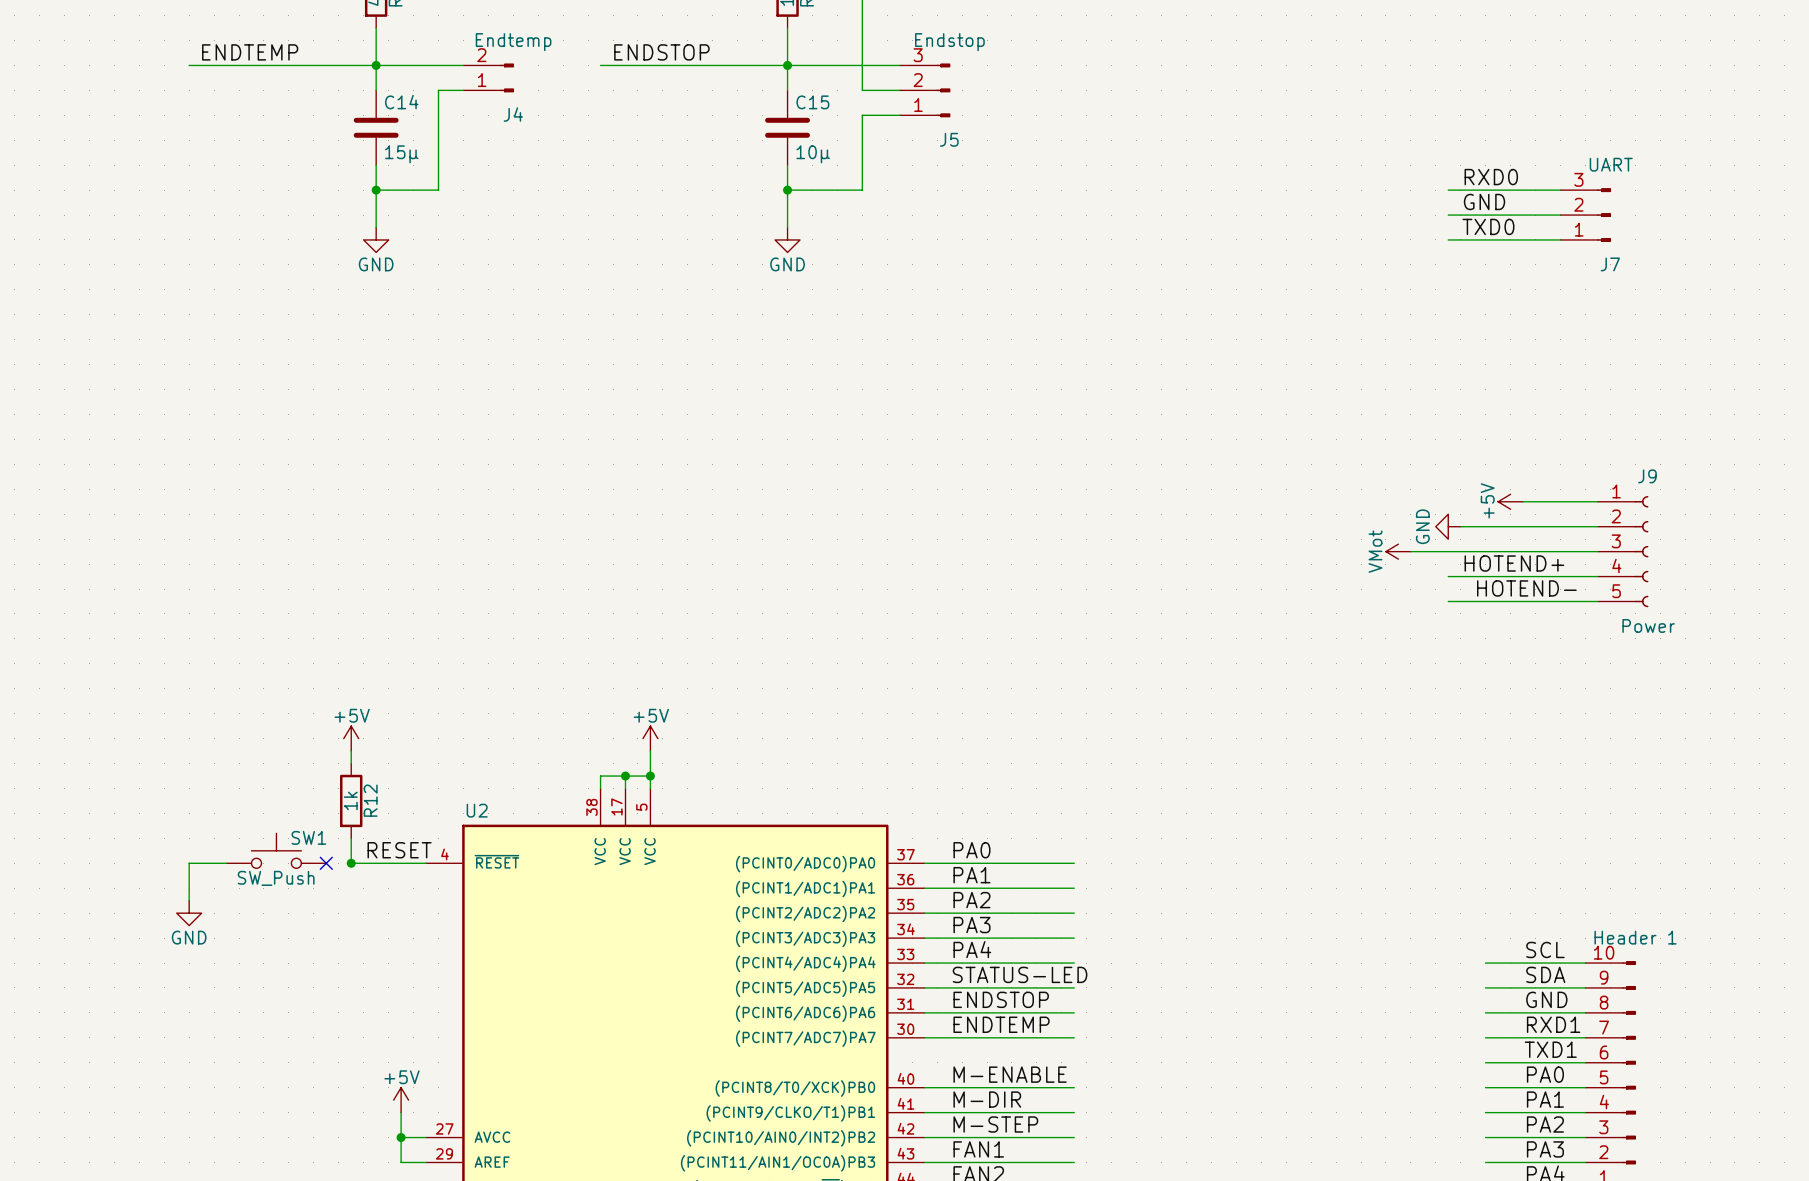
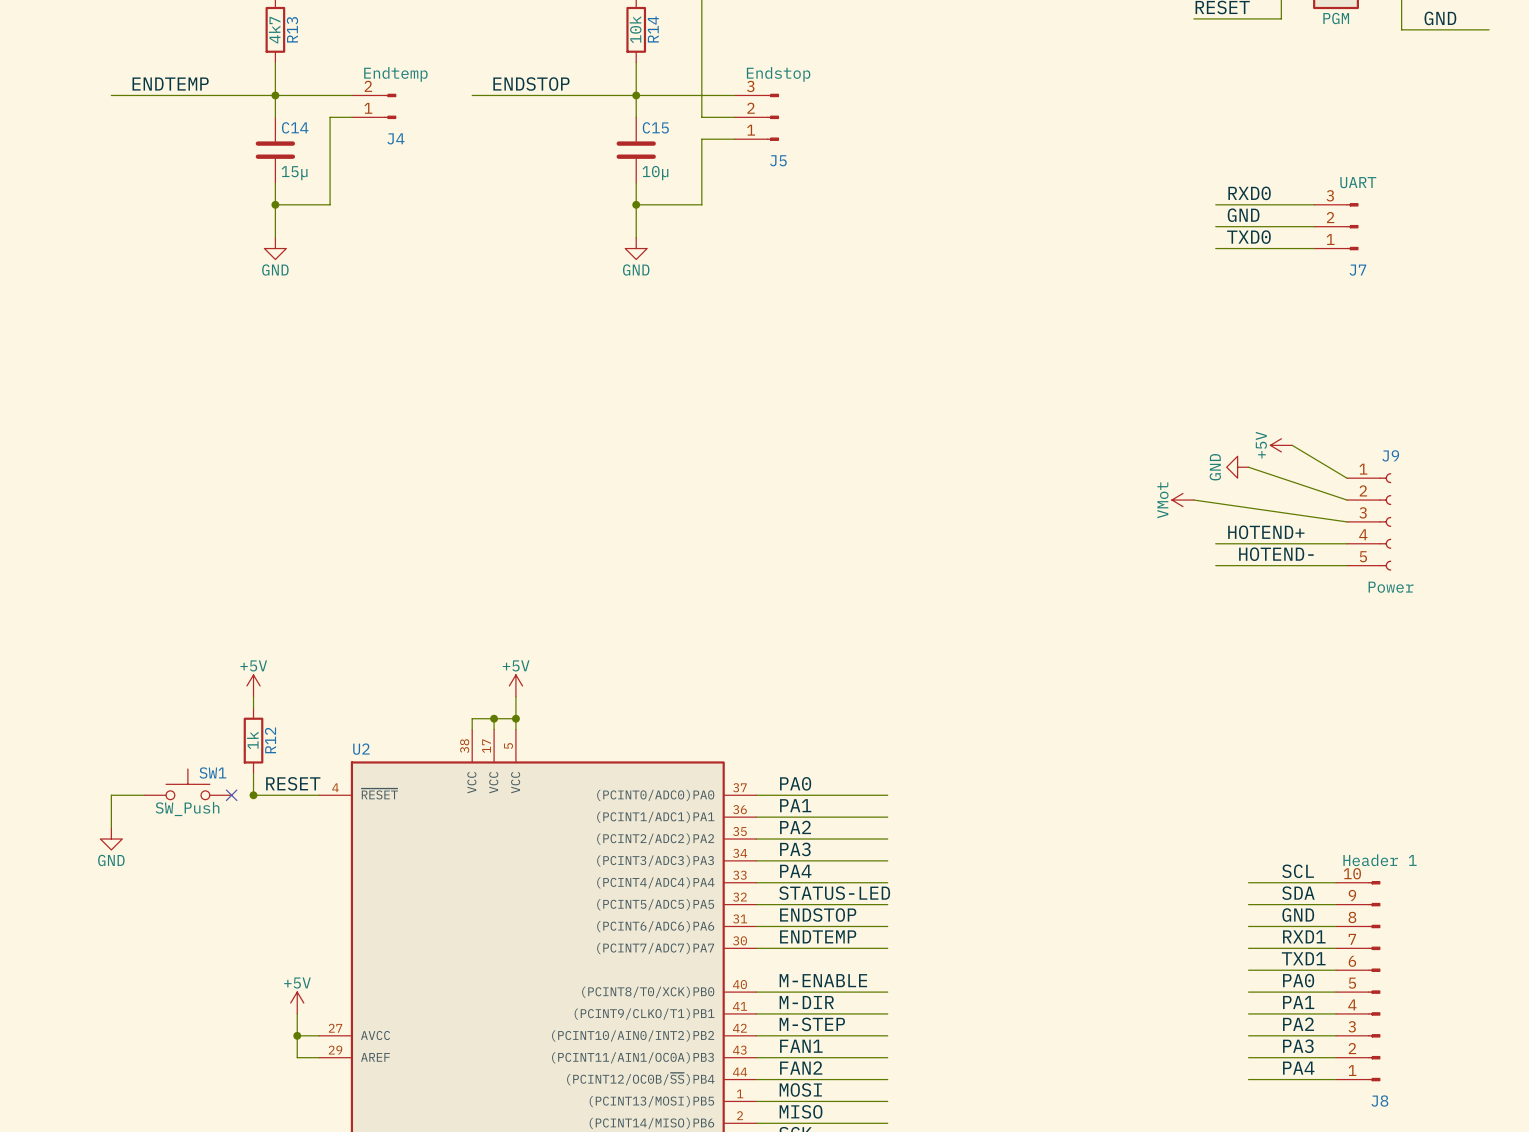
power symbol position: +5V (1510, 501) -> +5V (1281, 445)
wire: (1523, 501) (1597, 501) -> (1292, 445) (1346, 478)
power symbol position: GND (1448, 526) -> GND (1237, 467)
wire: (1460, 526) (1597, 526) -> (1248, 467) (1346, 500)
power symbol position: VMot (1398, 551) -> VMot (1182, 500)
wire: (1410, 551) (1597, 551) -> (1193, 500) (1346, 521)

